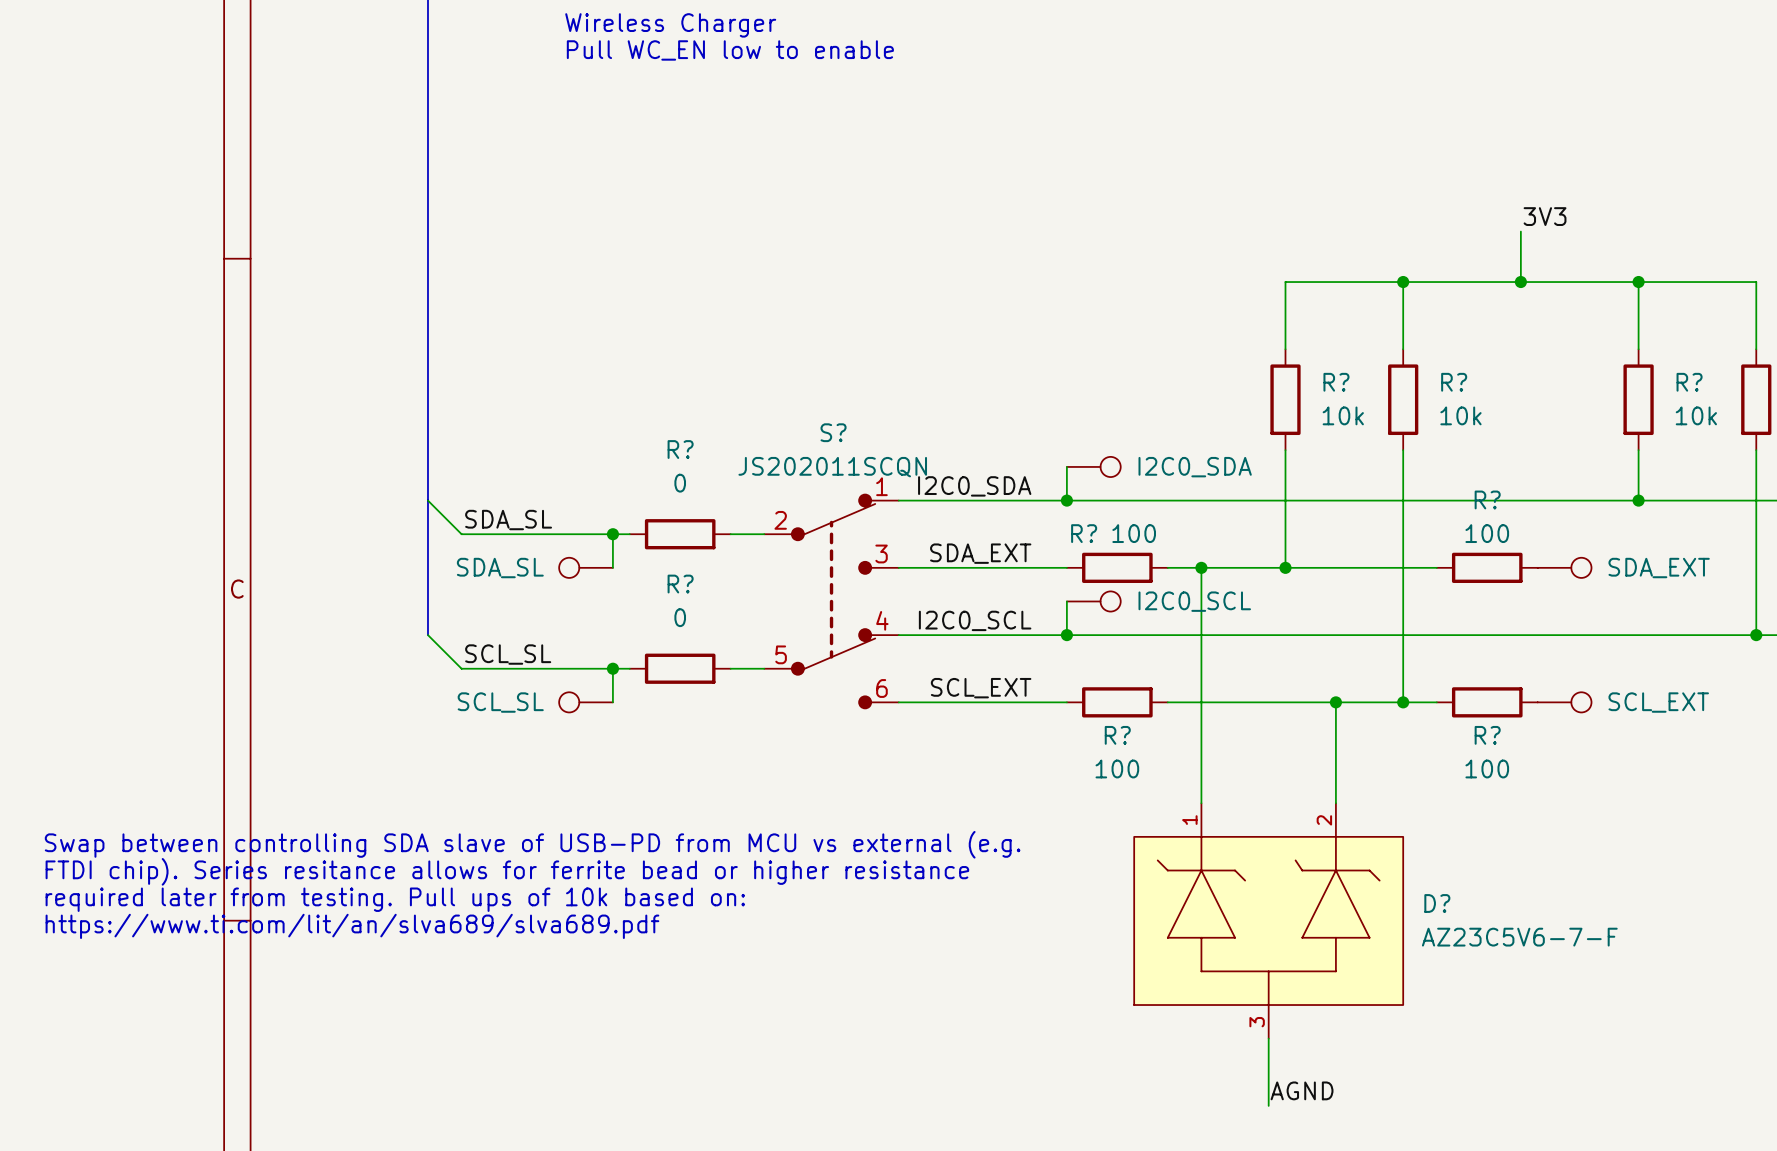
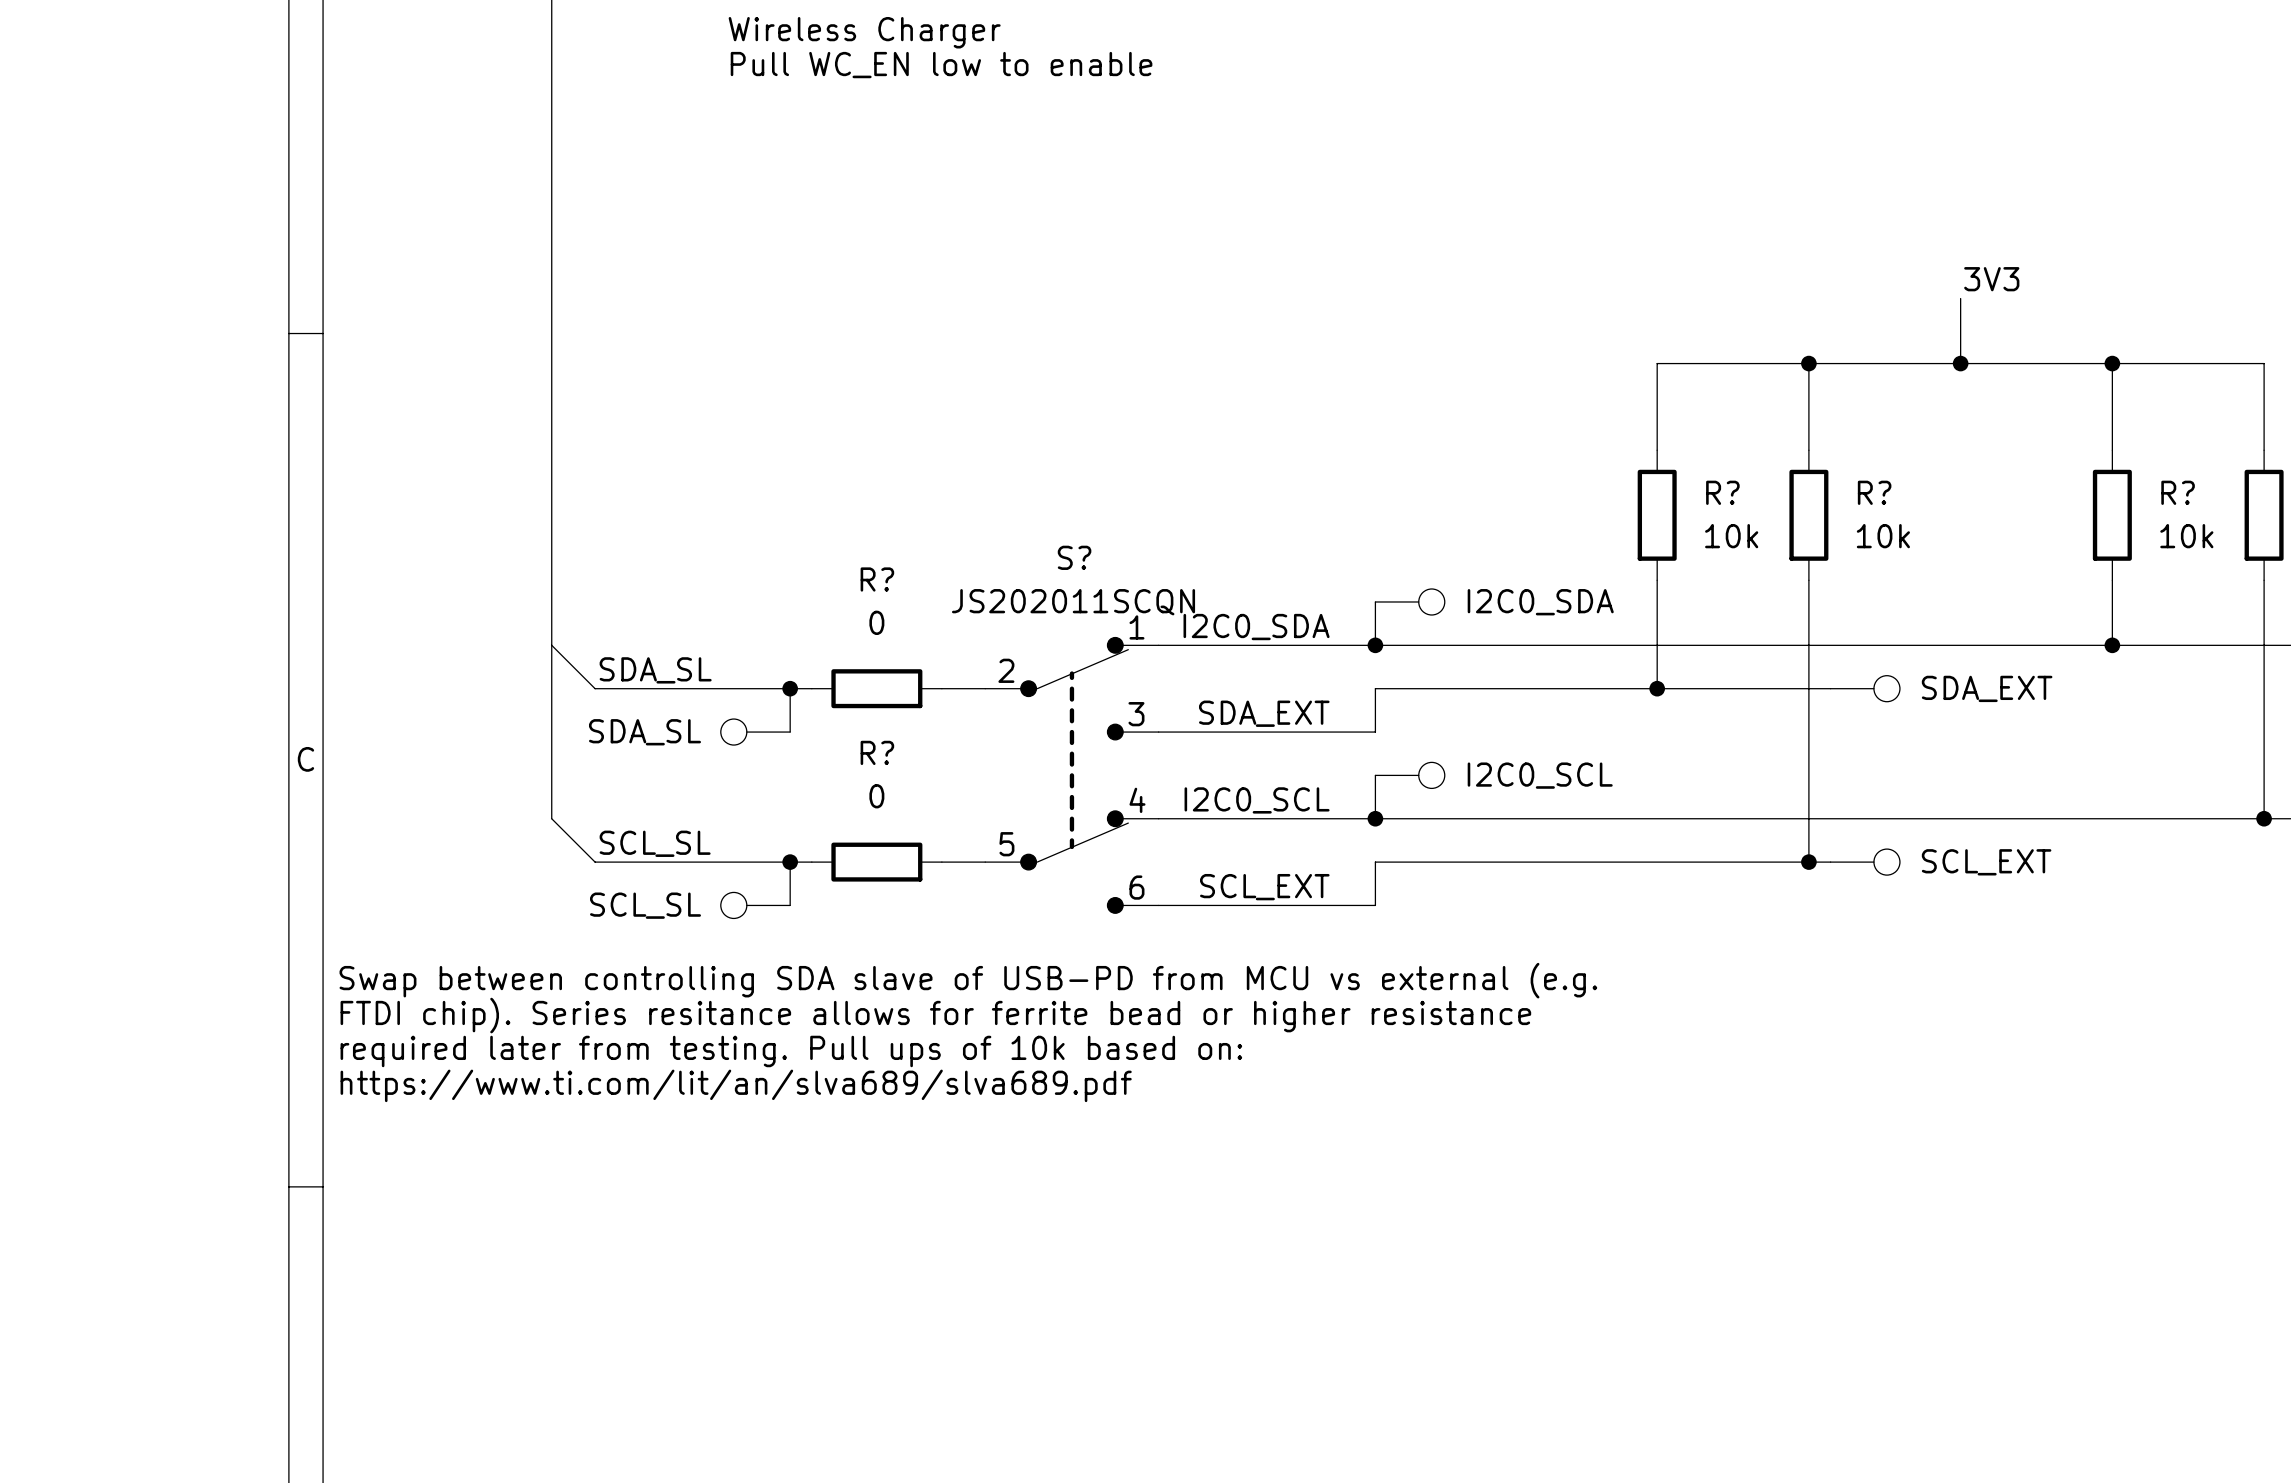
wire: (1285, 534) (1285, 567) -> none
wire: none -> (1830, 688) (1375, 688) (1375, 732)
R?: 100 (1117, 567) -> none
wire: (1167, 567) (1436, 567) -> none
wire: (1201, 567) (1201, 803) -> none
junction: (1201, 567) -> none
junction position: (1285, 567) -> (1657, 688)
R?: 100 (1487, 567) -> none
part position: (1564, 567) -> (1865, 688)
wire: (1403, 668) (1403, 702) -> none
wire: none -> (1830, 862) (1375, 862) (1375, 905)
R?: 100 (1117, 702) -> none
wire: (1167, 702) (1436, 702) -> none
wire: (1335, 702) (1335, 803) -> none
junction: (1335, 702) -> none
junction position: (1403, 702) -> (1808, 862)
R?: 100 (1487, 702) -> none
part position: (1564, 702) -> (1865, 862)
text position: Swap between controlling SDA slave of USB-PD from MCU vs external (e.g. (532, 844) -> Swap between controlling SDA slave of USB-PD from MCU vs external (e.g. (968, 980)
text position: FTDI chip). Series resitance allows for ferrite bead or higher resistance (507, 871) -> FTDI chip). Series resitance allows for ferrite bead or higher resistance (935, 1015)
text position: required later from testing. Pull ups of 10k based on: (395, 899) -> required later from testing. Pull ups of 10k based on: (791, 1051)
D?: AZ23C5V6-7-F (1268, 920) -> none
text position: https://www.ti.com/lit/an/slva689/slva689.pdf (352, 926) -> https://www.ti.com/lit/an/slva689/slva689.pdf (736, 1085)
wire: (1268, 1038) (1268, 1105) -> none
label: AGND (1302, 1090) -> none

